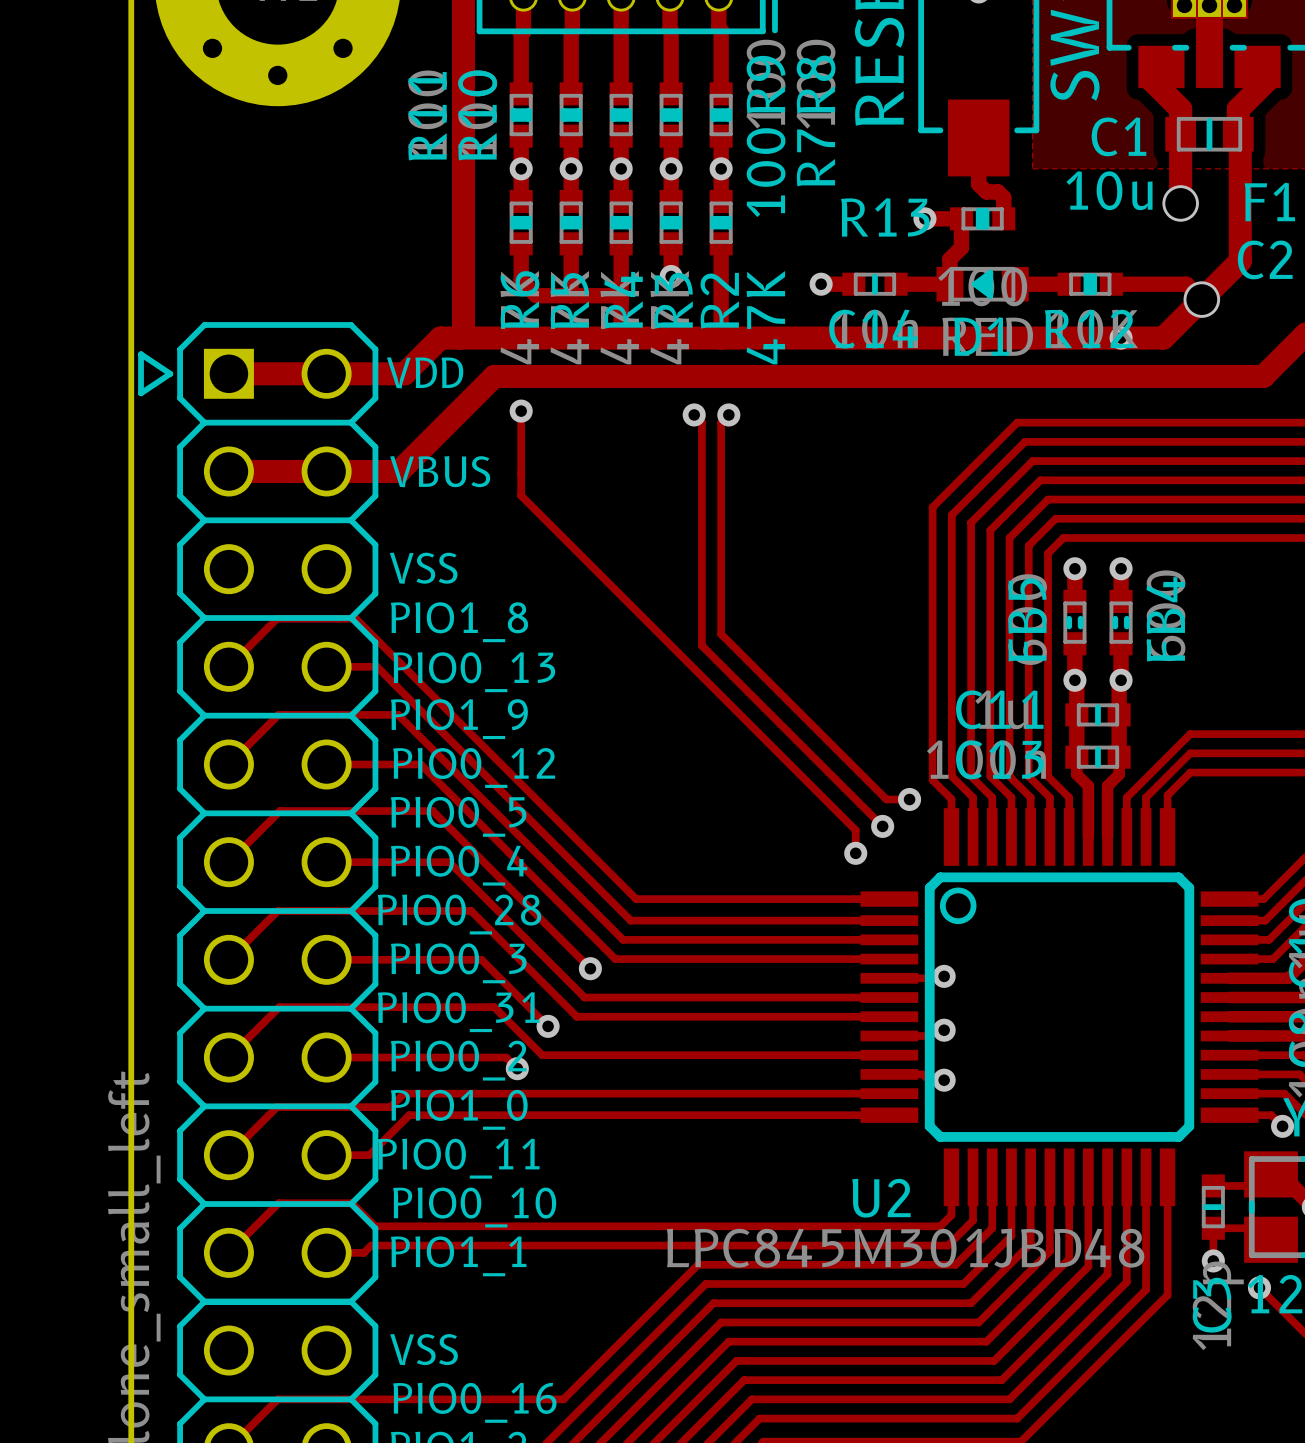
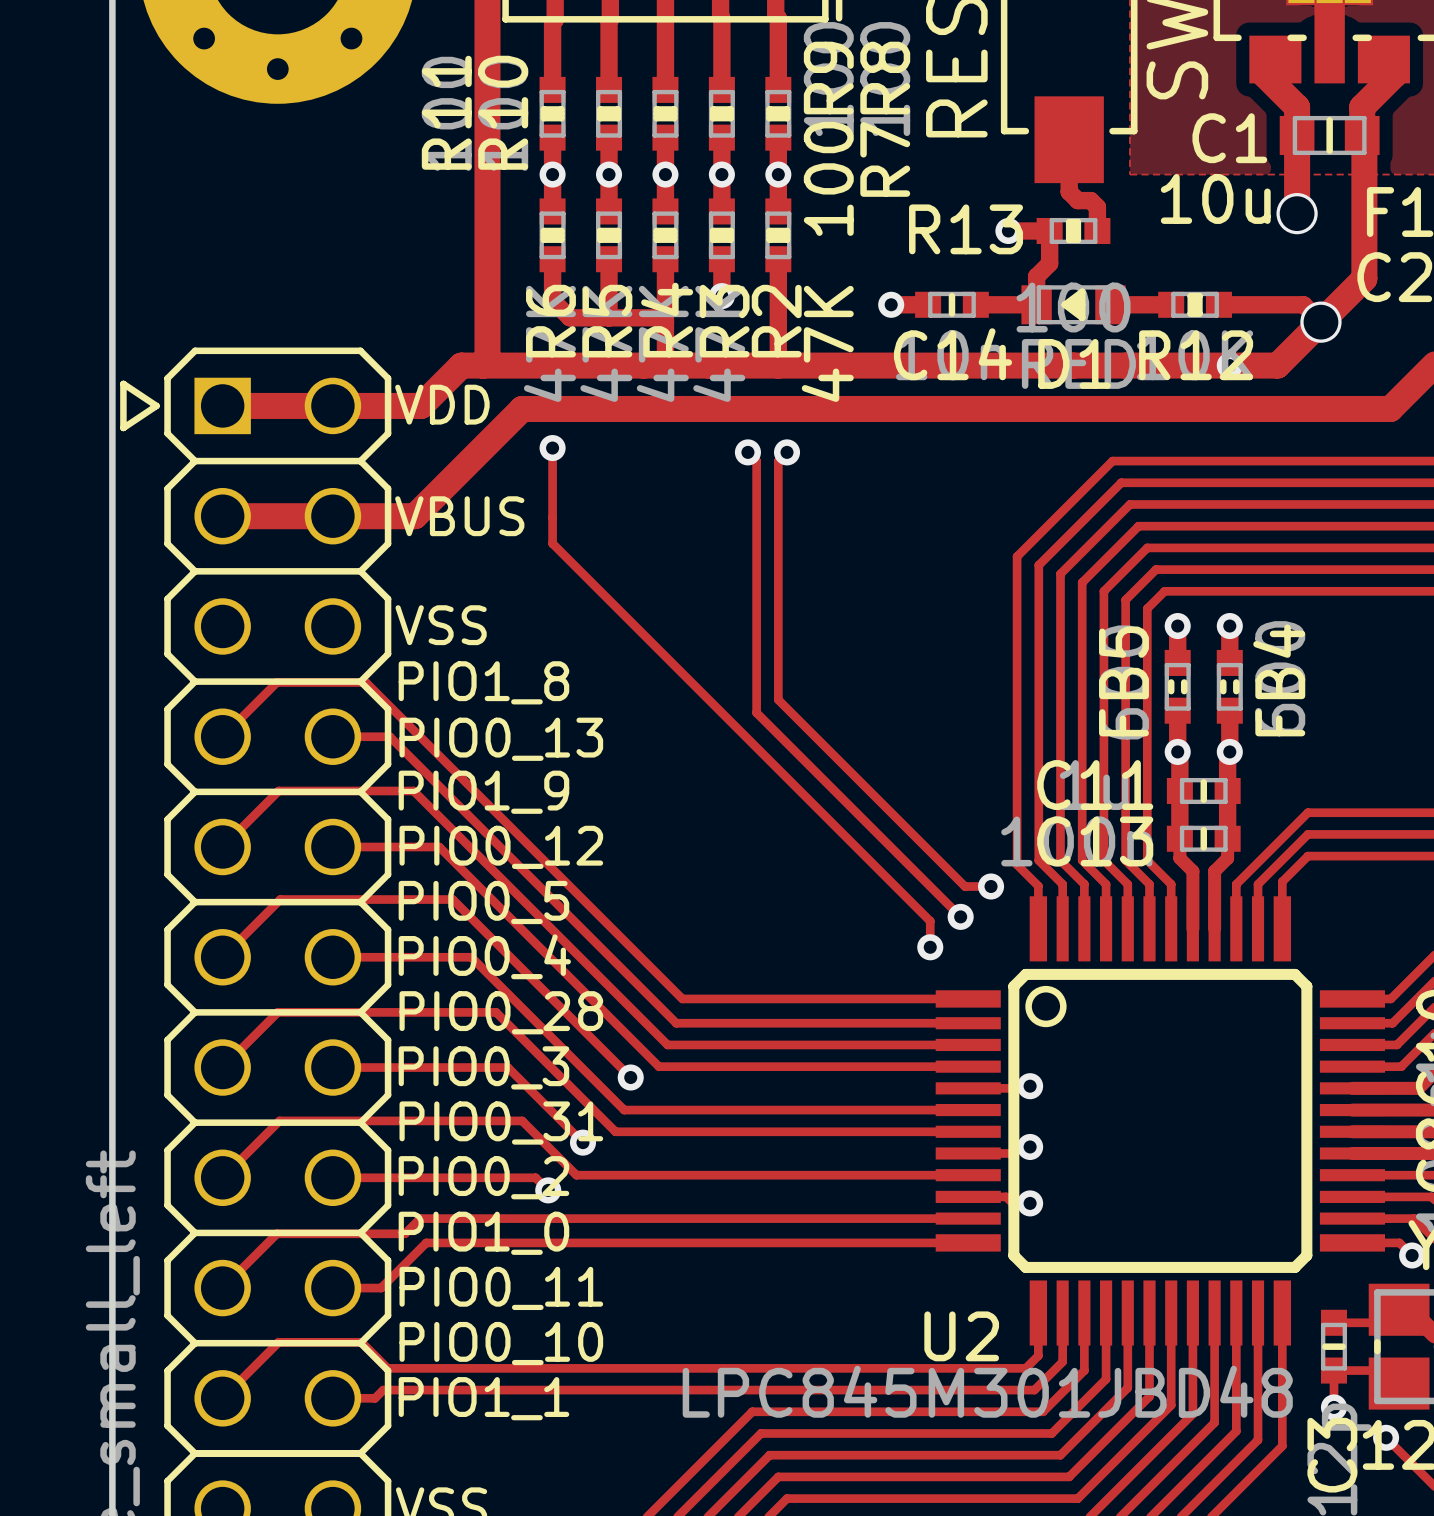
part text position: PIO0_28 (459, 914) -> PIO0_28 (501, 1012)
part text position: PIO0_31 (458, 1012) -> PIO0_31 (501, 1123)
part text position: PIO0_11 (458, 1158) -> PIO0_11 (501, 1288)

